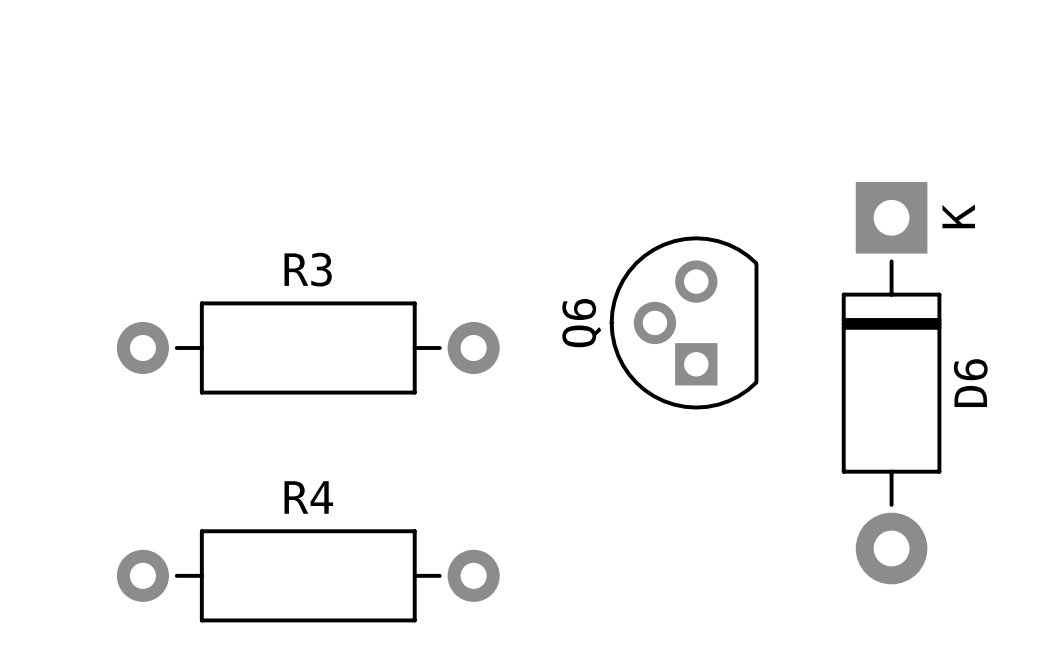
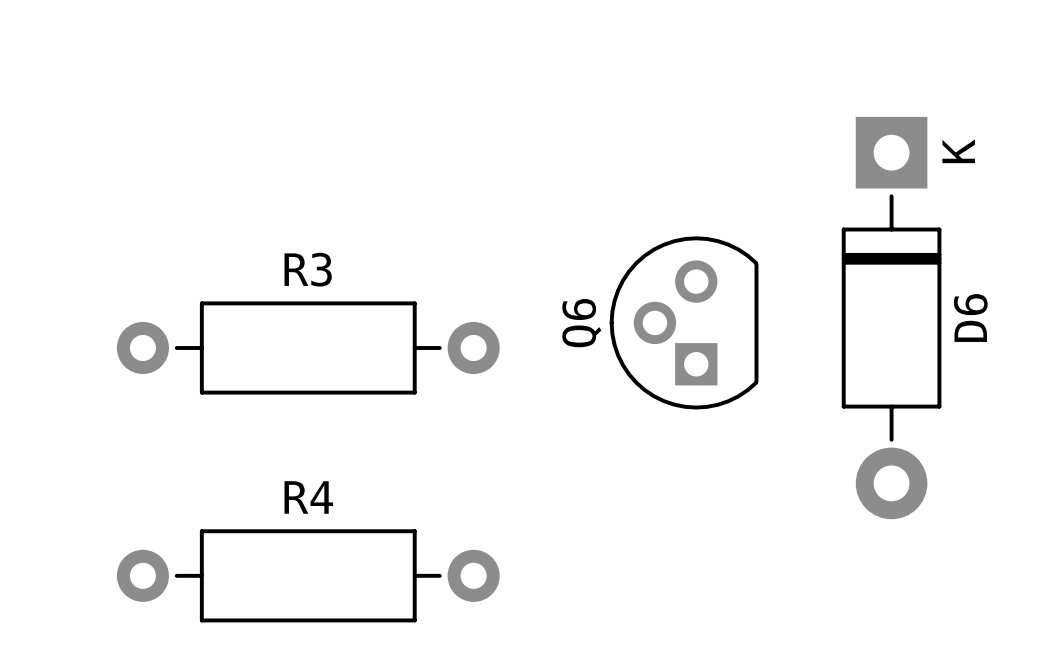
D6 position: (891, 383) -> (891, 318)

